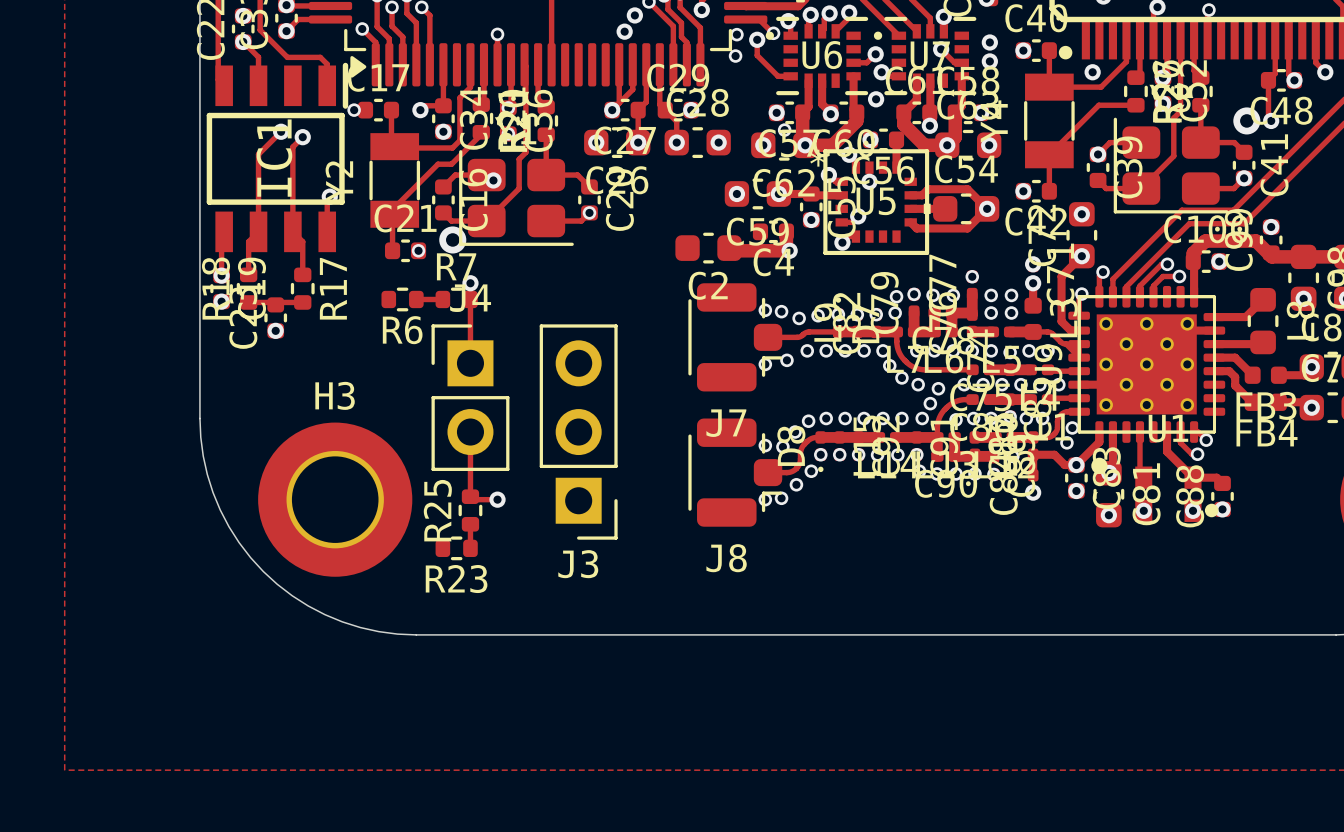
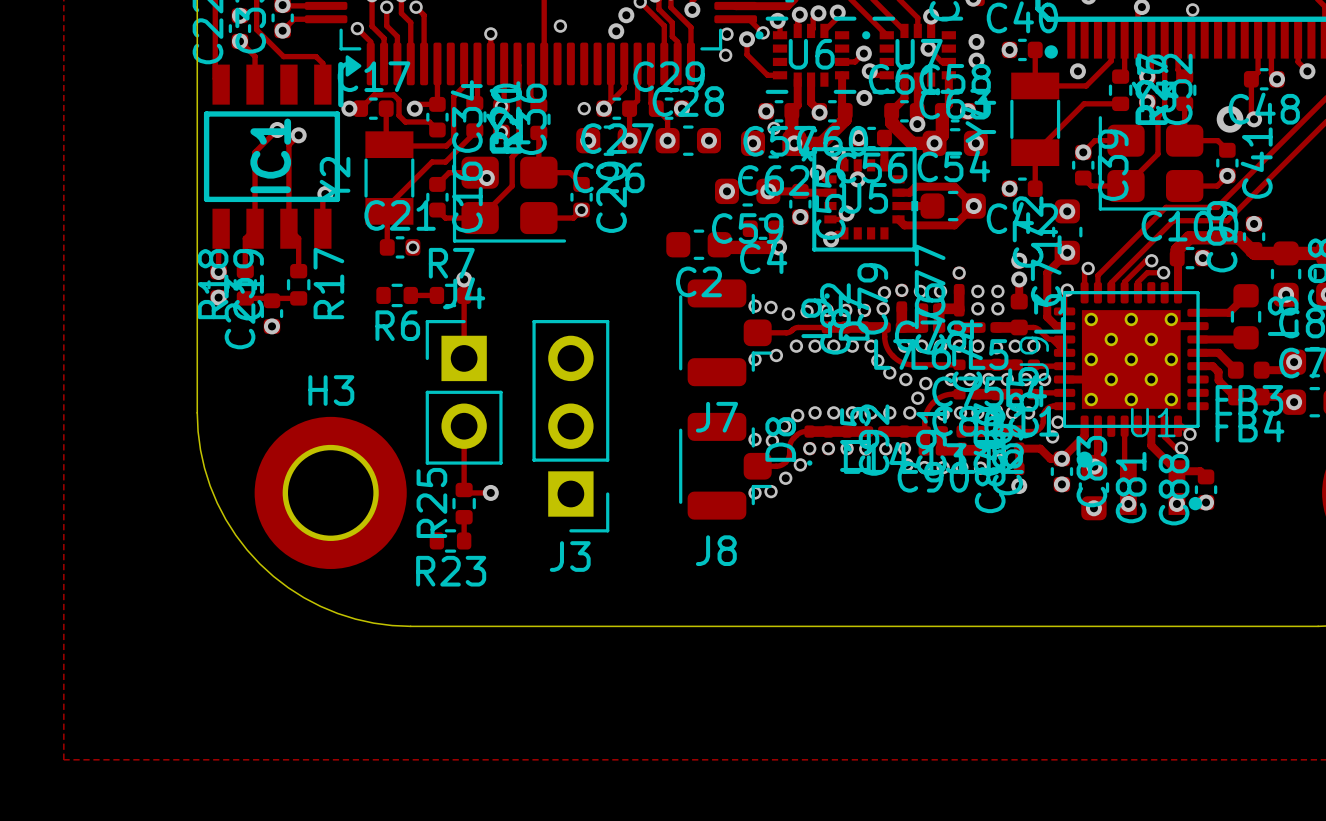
via: none -> (560, 26)
via: (354, 110) -> none
track: none -> (360, 108) (374, 95) (393, 95) (399, 100) (399, 115) (405, 121) (429, 121) (437, 129)
via: none -> (584, 108)
via position: (443, 131) -> (349, 108)
via: (452, 239) -> none

